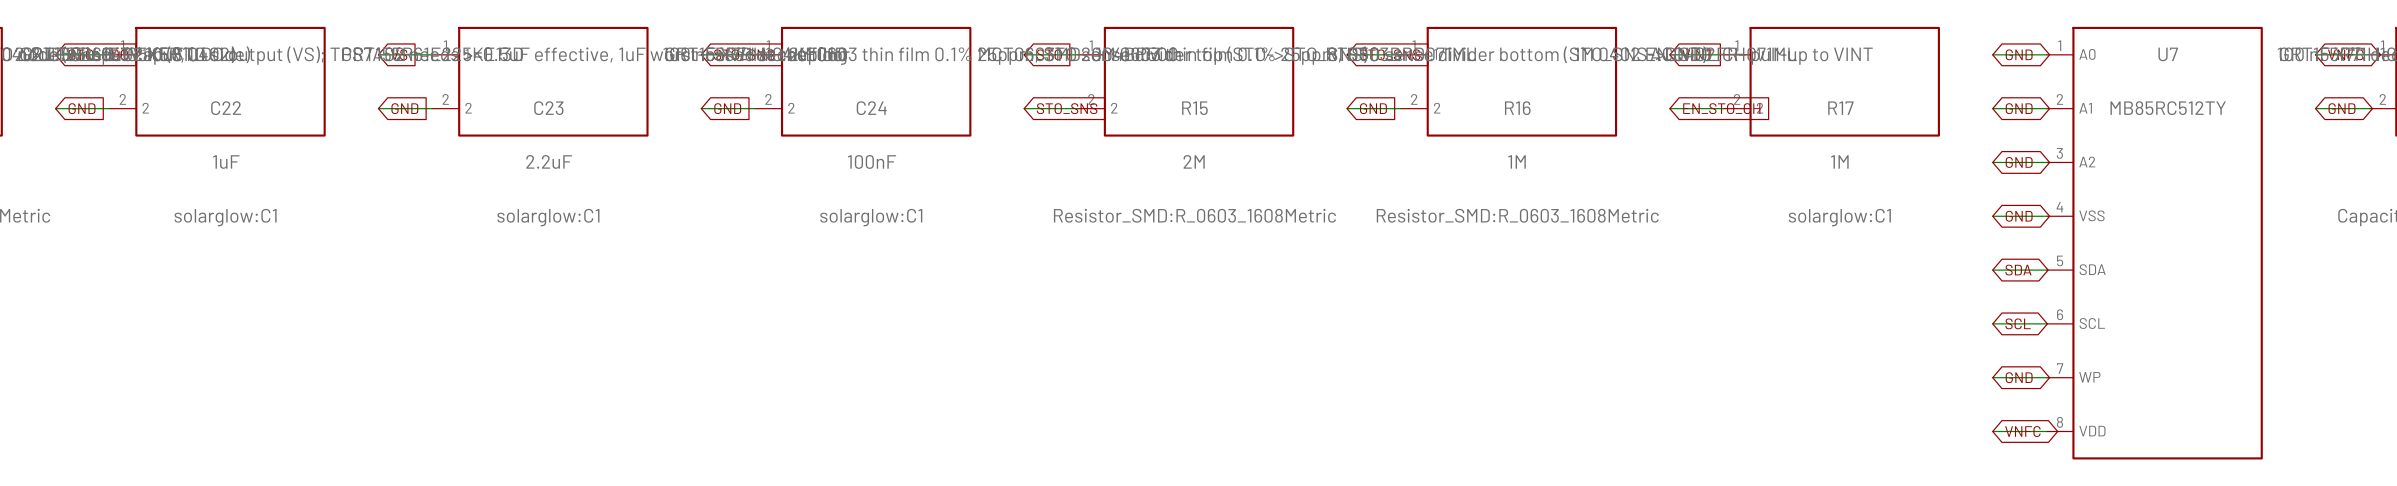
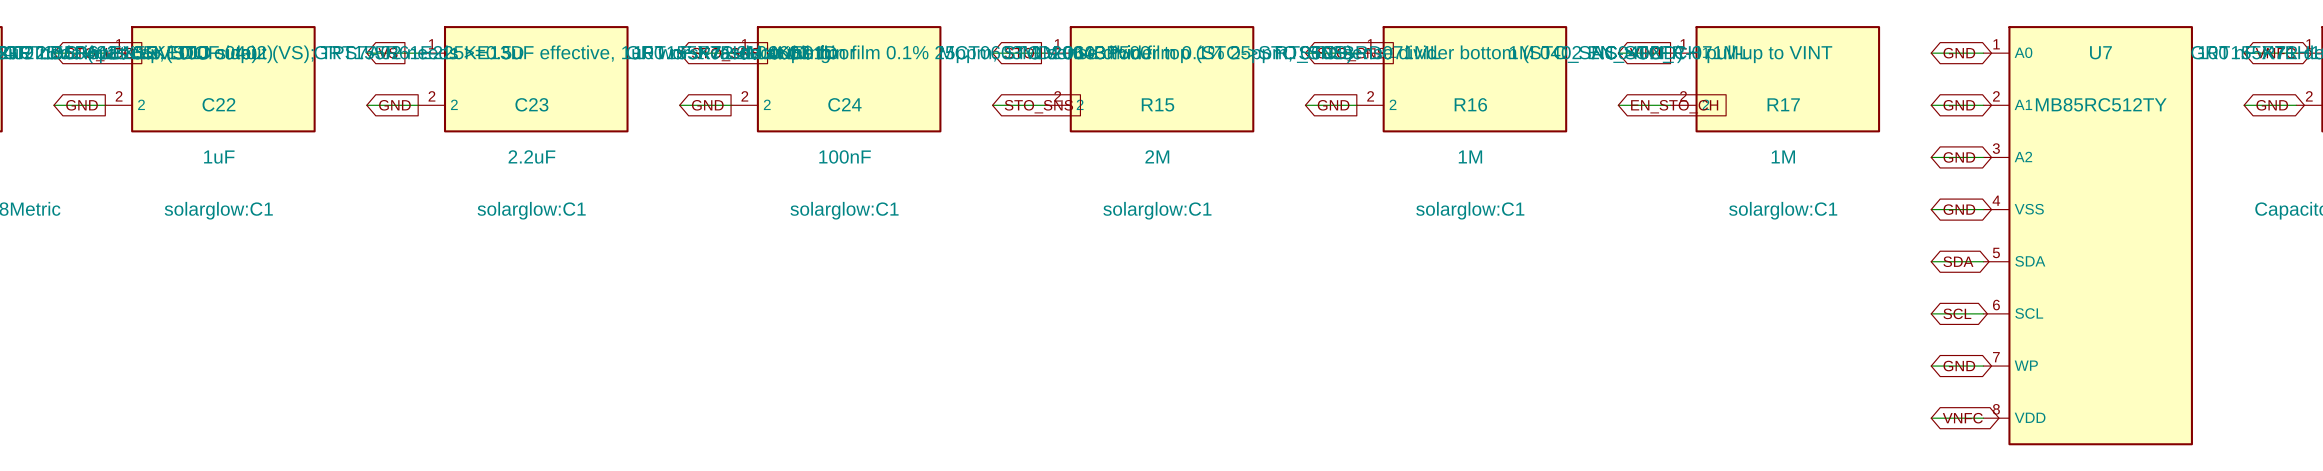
R15 text: Resistor_SMD:R_0603_1608Metric (1194, 215) -> solarglow:C1 (1157, 210)
R16 text: Resistor_SMD:R_0603_1608Metric (1517, 215) -> solarglow:C1 (1470, 210)

